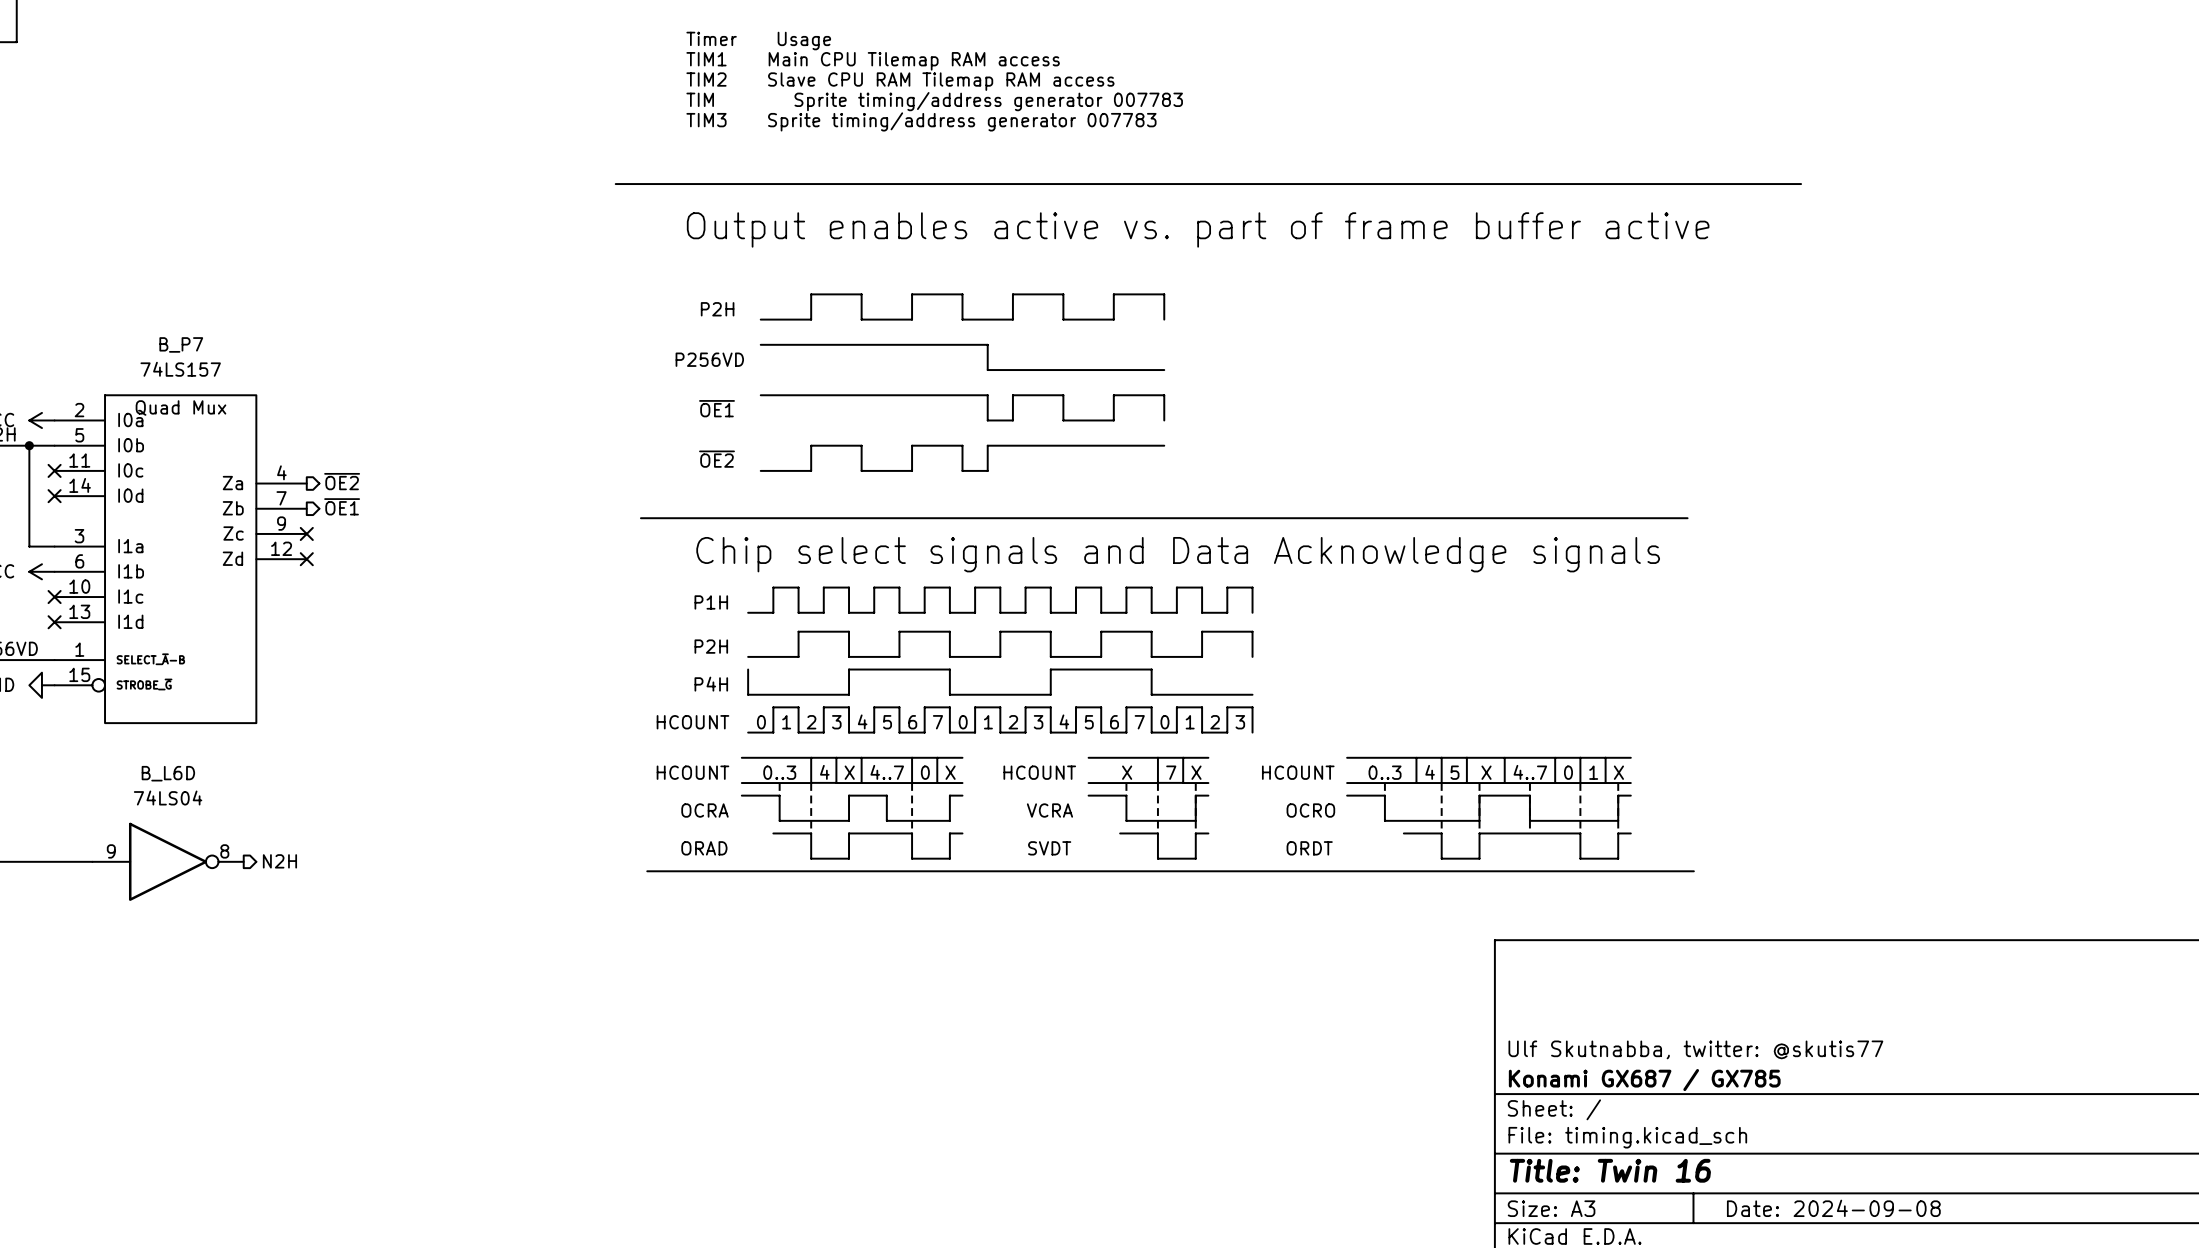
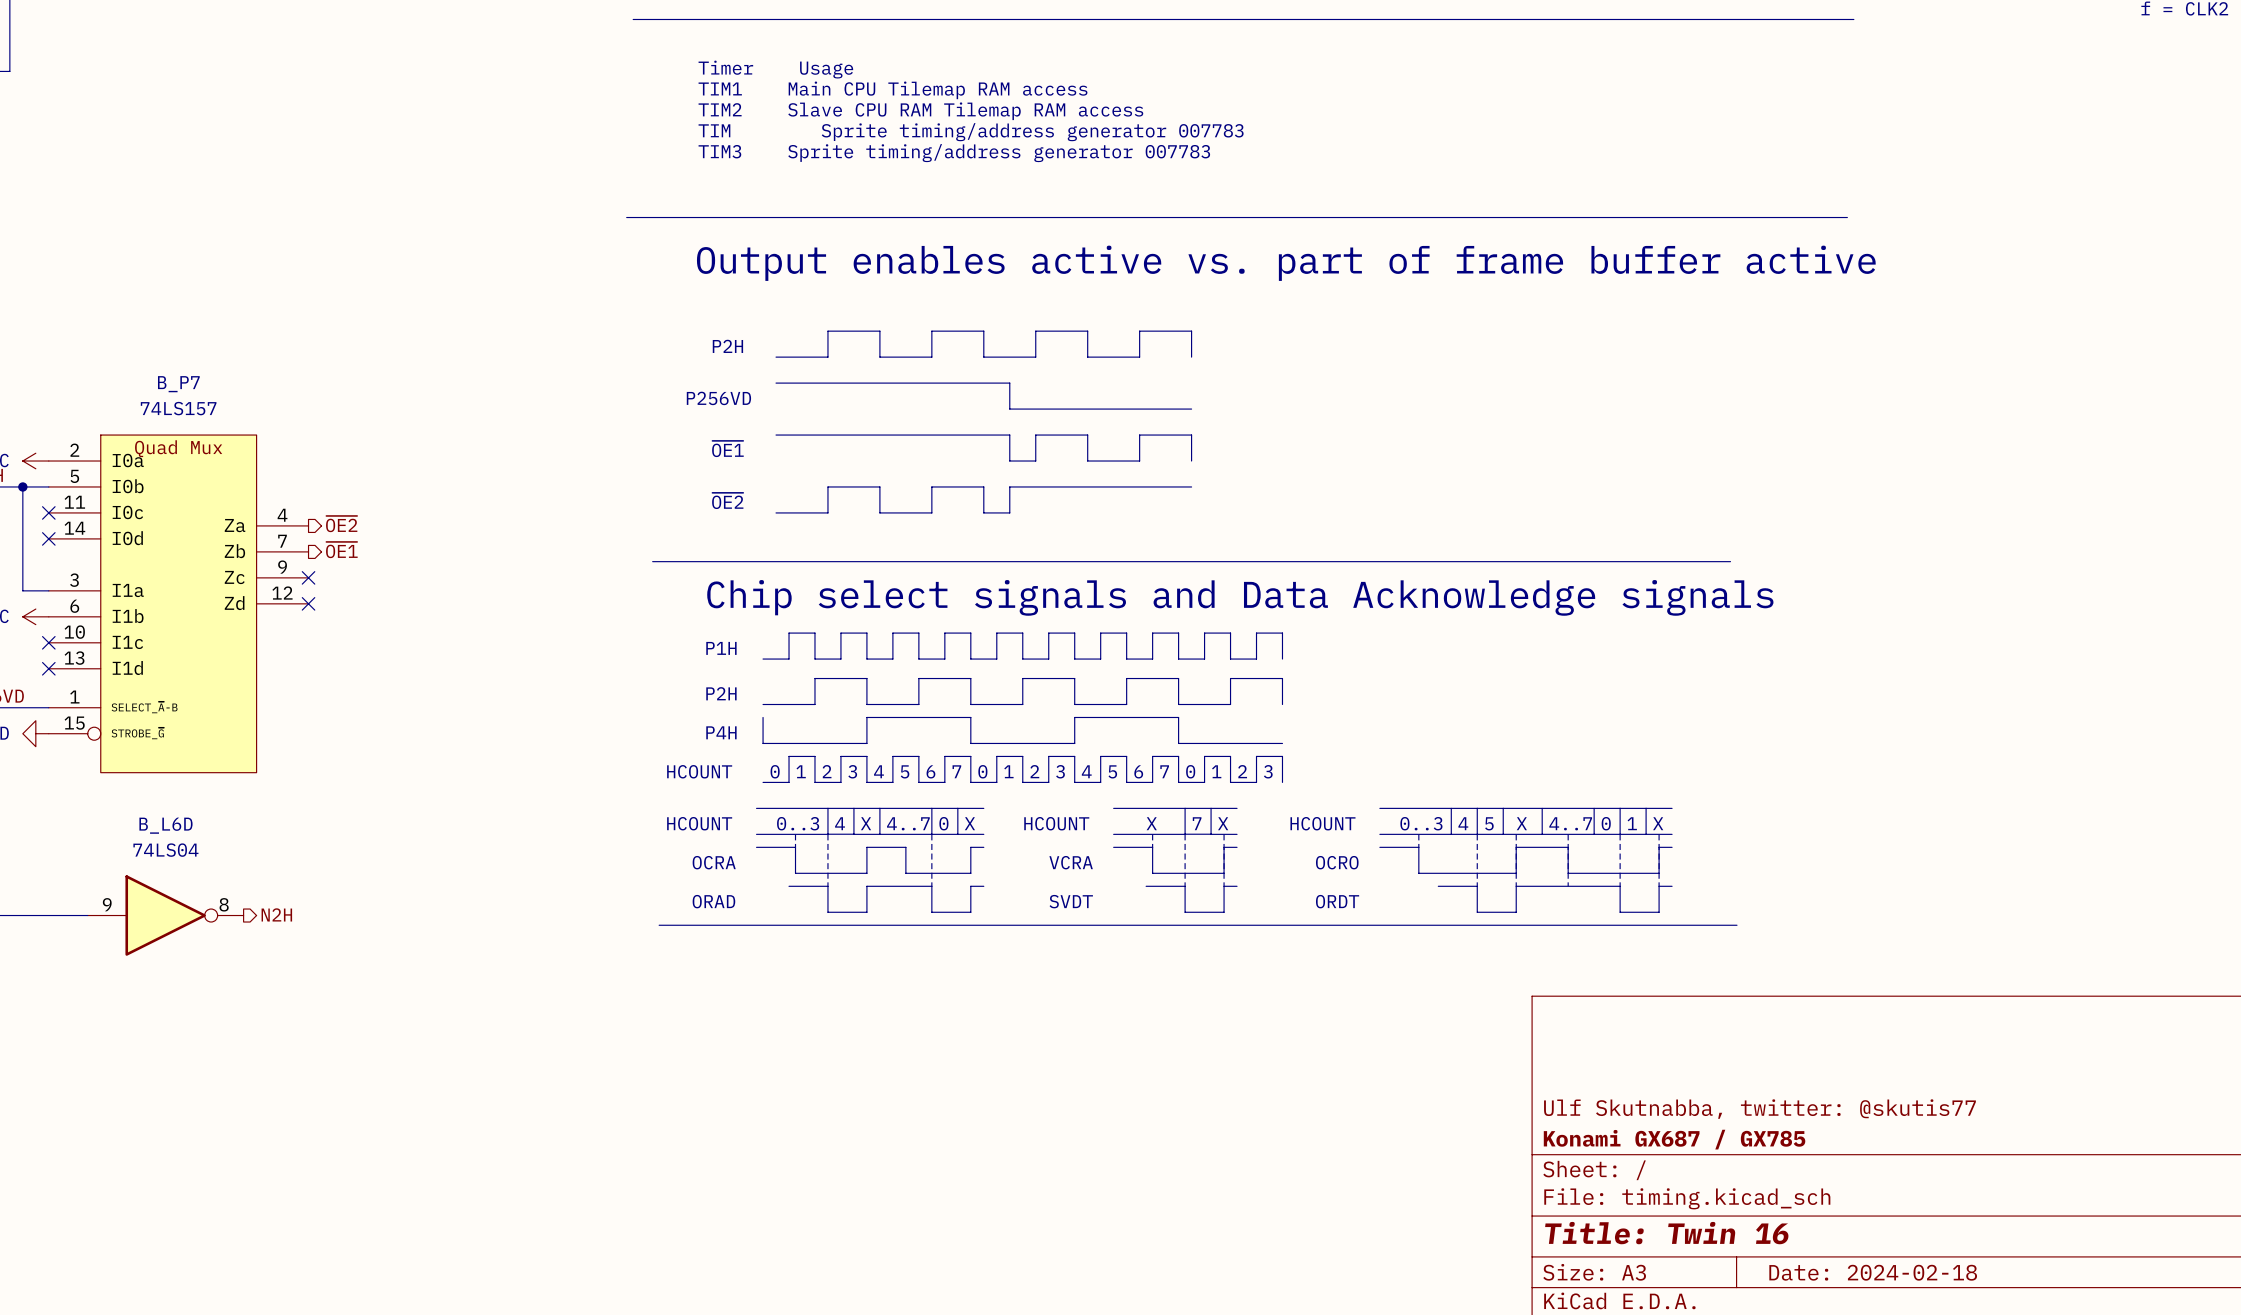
title block: Date: 2024-09-08 (1833, 1208) -> Date: 2024-02-18 (1873, 1272)

